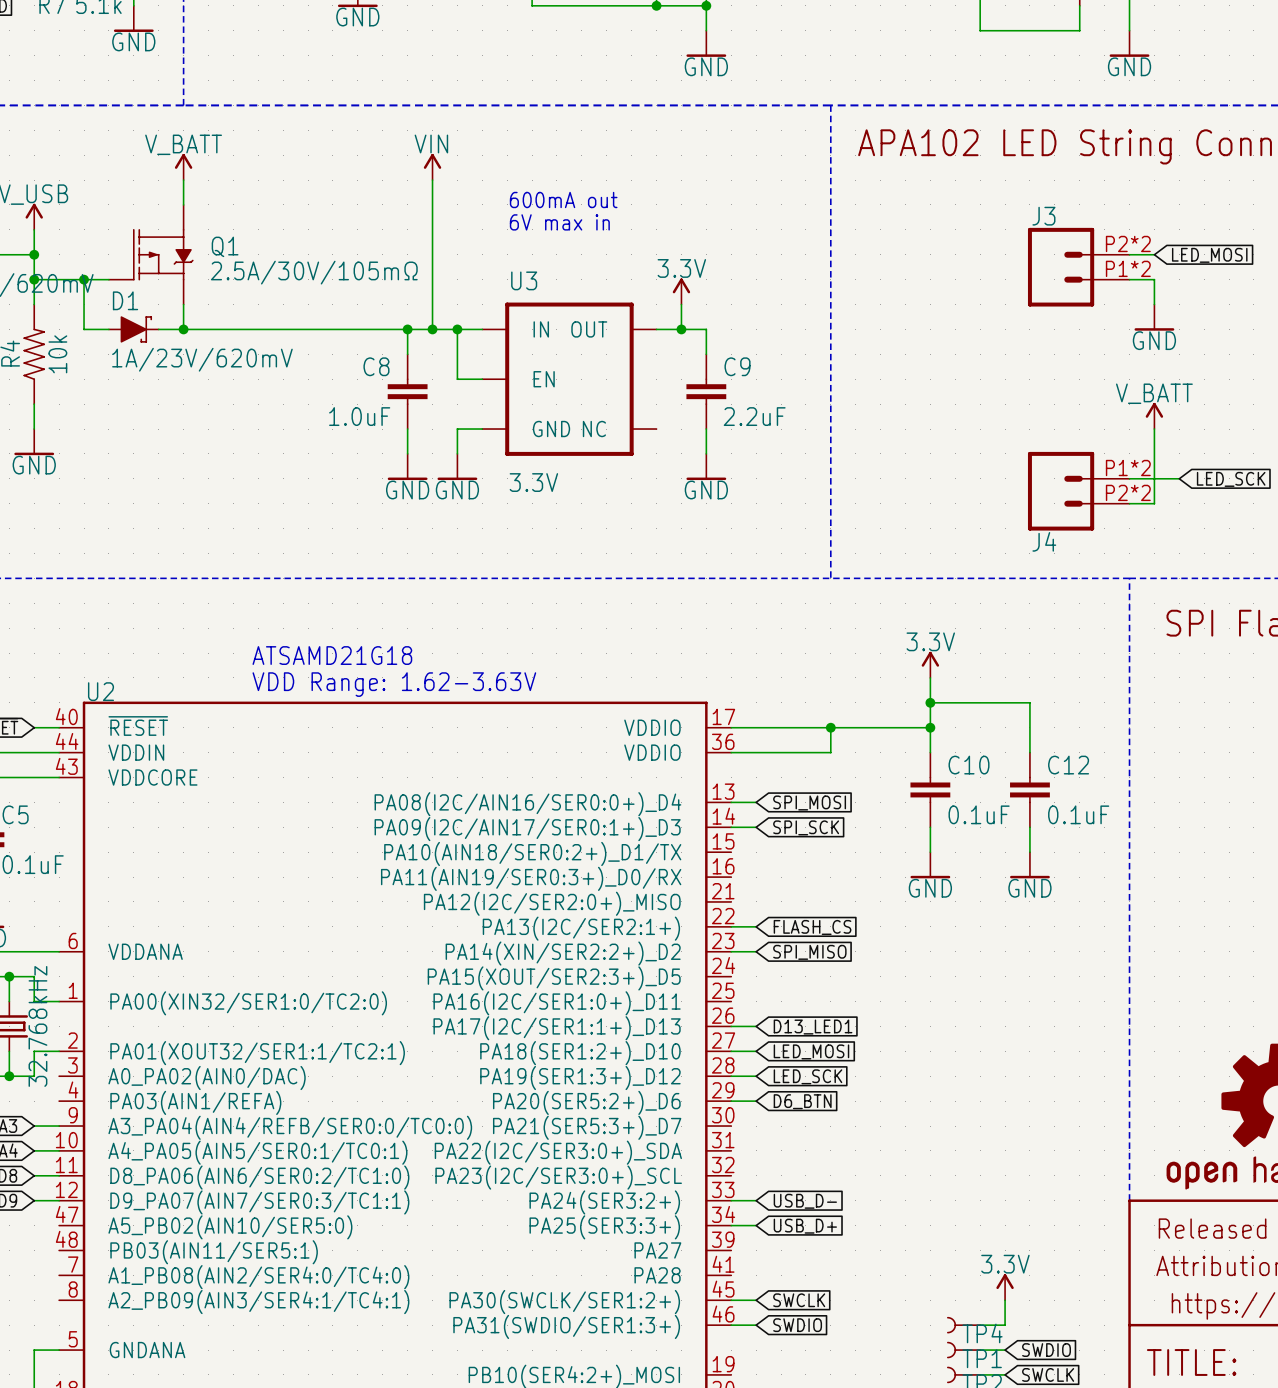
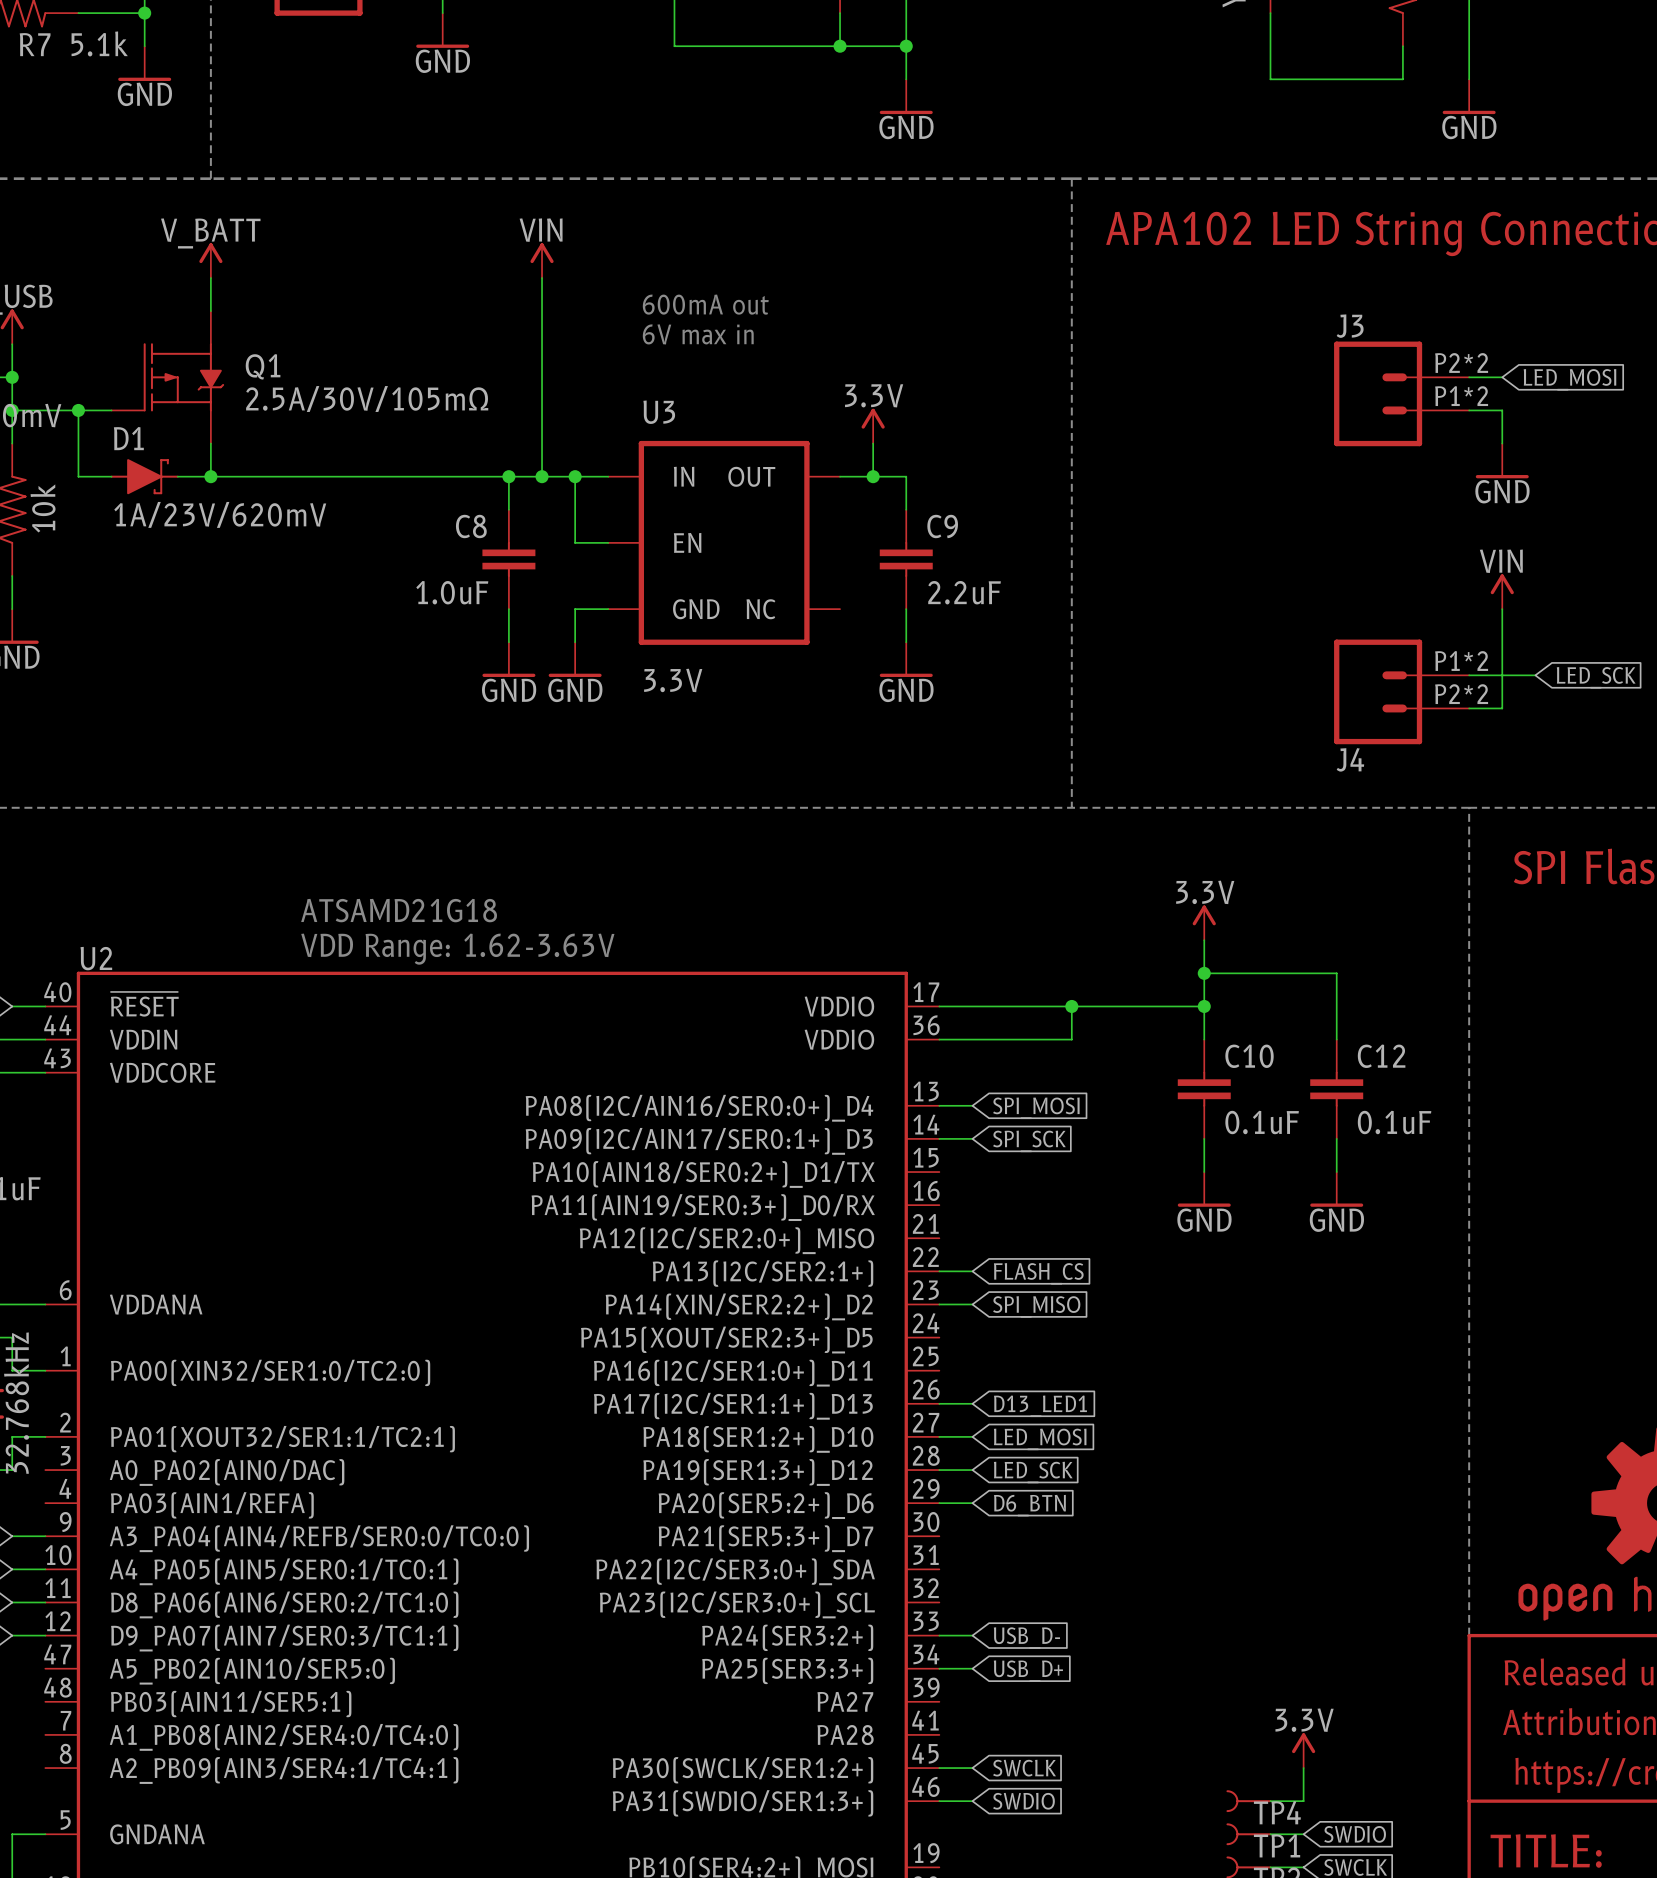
power symbol: V_BATT (1154, 415) -> VIN (1502, 591)

